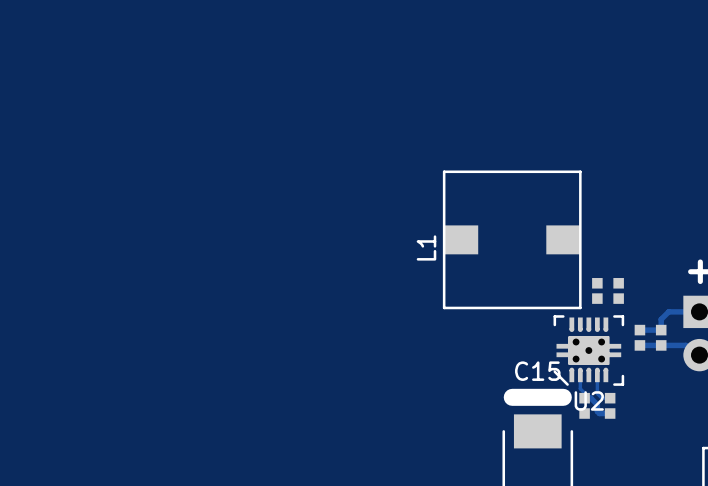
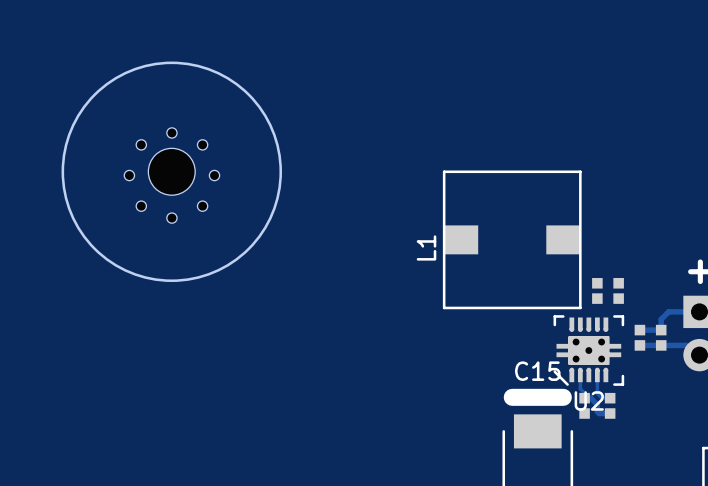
round board edge: none -> [61, 61, 283, 283]
part: none -> (171, 175)

